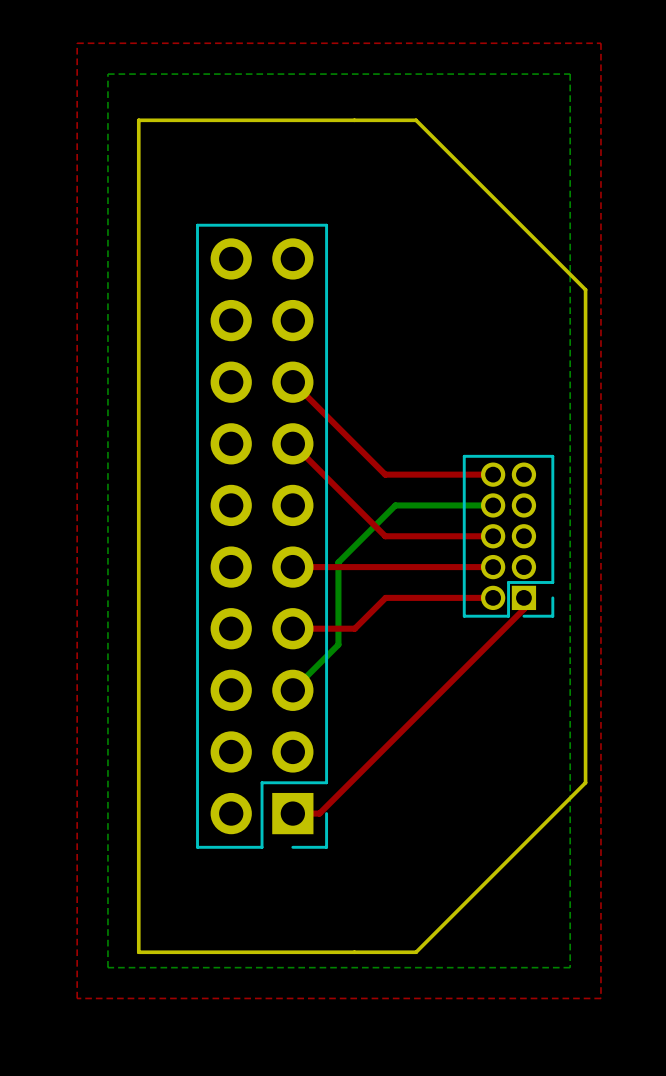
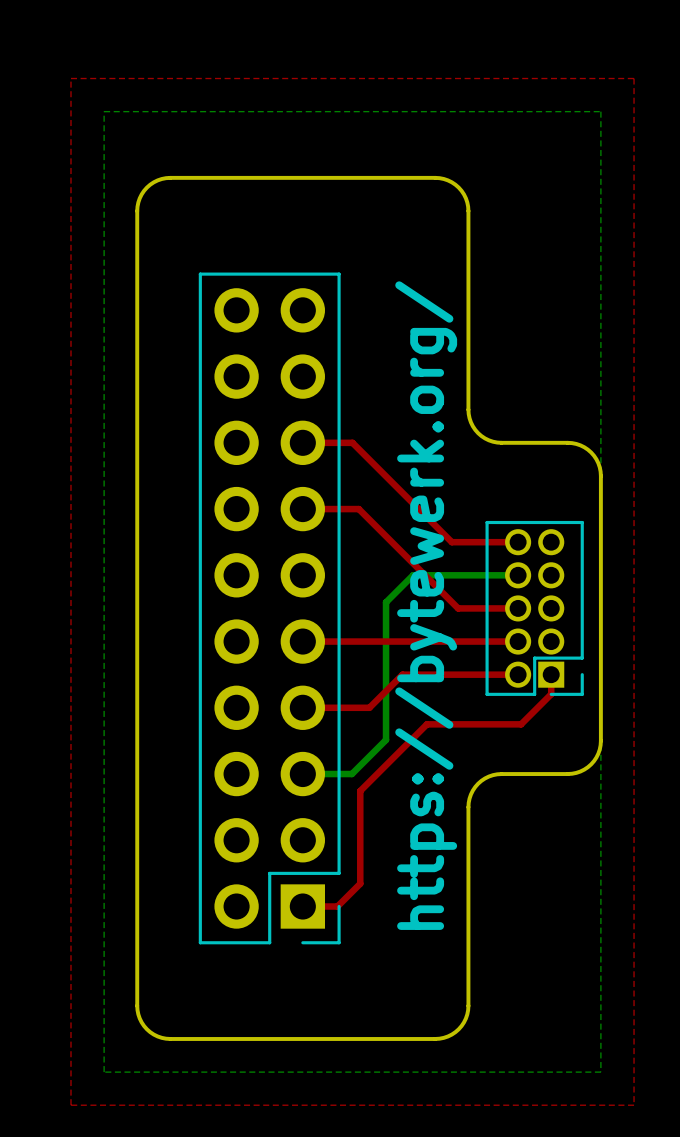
board edge: (138, 166) (138, 120) (416, 120) (585, 289) (585, 782) (416, 952) (138, 952) (138, 906) -> (137, 211) (138, 202) (144, 190) (153, 182) (166, 178) (435, 177) (451, 182) (463, 194) (468, 206) (468, 409) (472, 426) (484, 438) (497, 442) (567, 442) (580, 445) (587, 449) (596, 459) (600, 475) (599, 749) (591, 764) (576, 772) (497, 774) (484, 778) (472, 790) (468, 807) (468, 1005) (467, 1014) (461, 1026) (451, 1034) (435, 1038) (170, 1038) (157, 1036) (146, 1029) (139, 1018) (137, 1005)
top track: (292, 382) (385, 474) (431, 474) -> (302, 442) (352, 442) (451, 542)
top track: (292, 443) (385, 536) (437, 536) -> (302, 509) (358, 509) (458, 608)
bottom track: (370, 530) (338, 562) (338, 644) (292, 690) -> (386, 602) (386, 739) (351, 774) (302, 774)
text: none -> https://bytewerk.org/ (426, 605)
top track: (523, 609) (319, 813) -> (551, 686) (551, 694) (521, 724) (426, 724) (360, 791) (360, 883) (337, 906) (331, 906)

